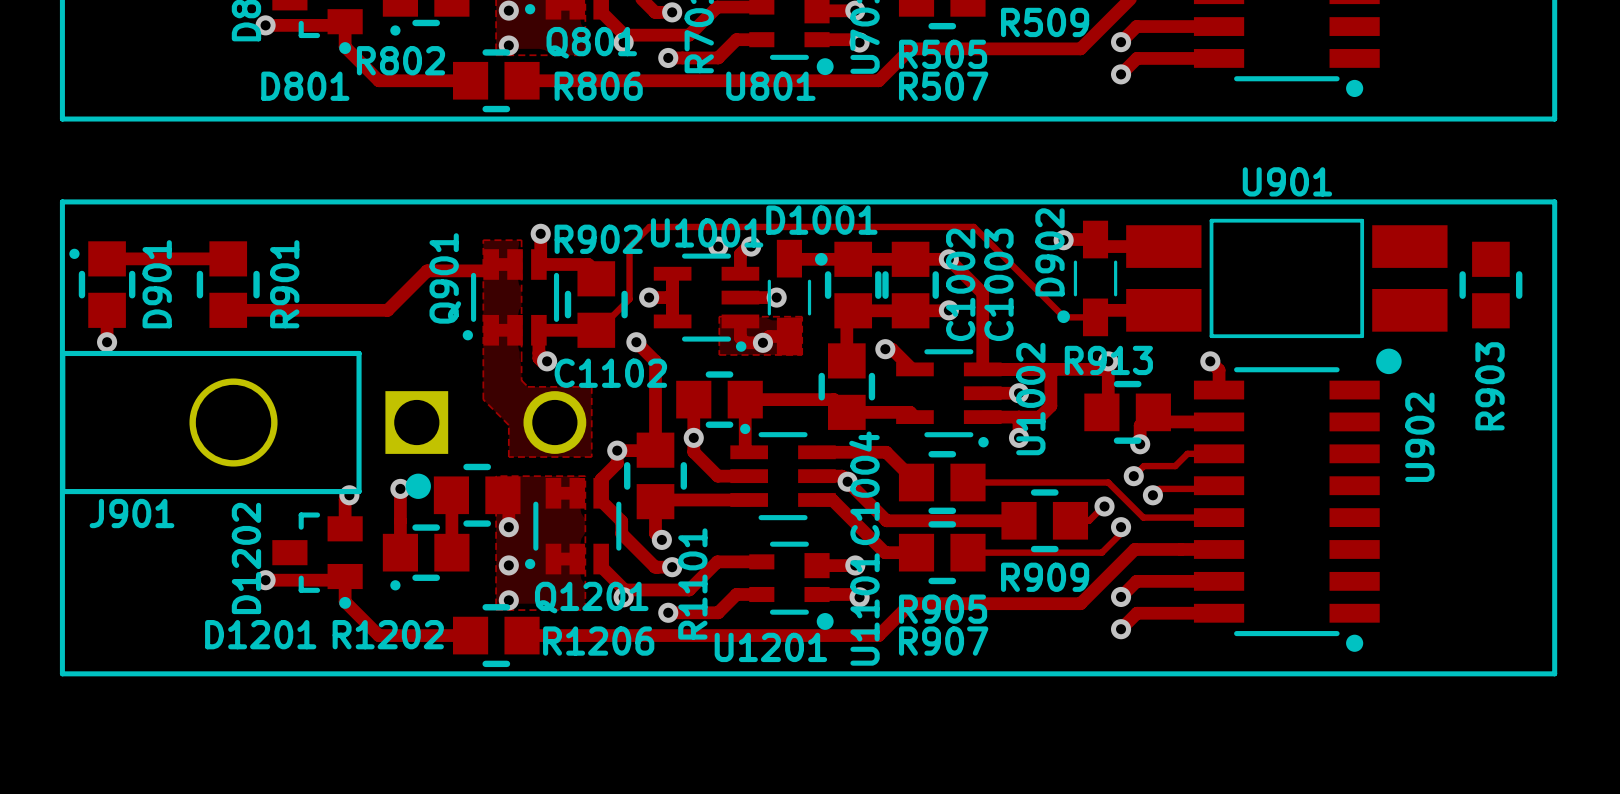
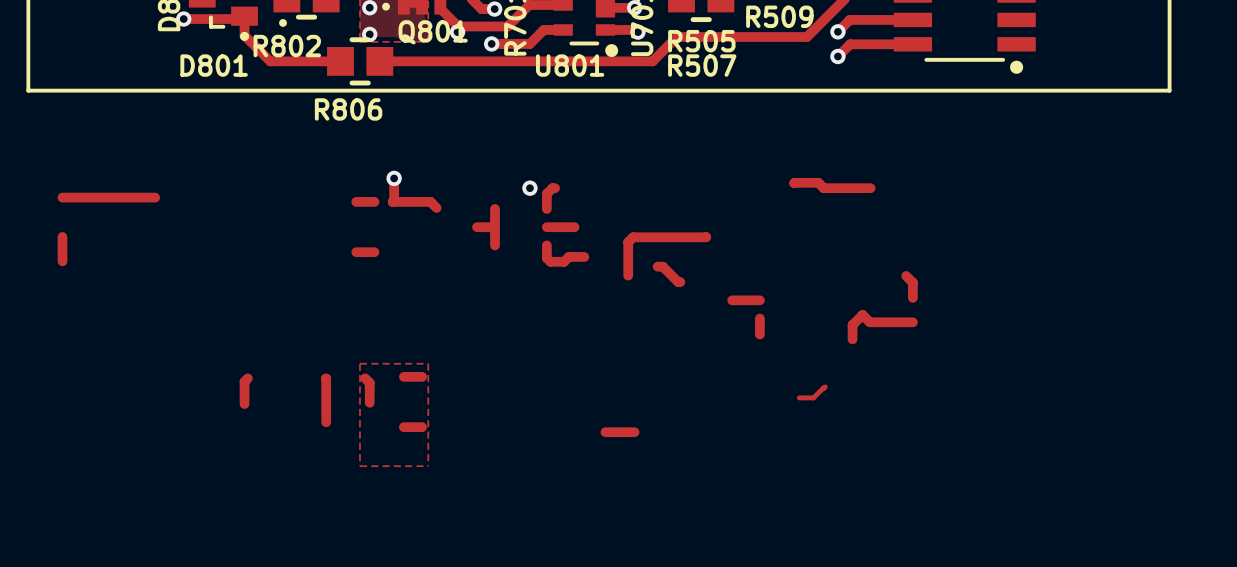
R806 name position: R806 (598, 86) -> R806 (348, 109)
line: (62, 201) (1554, 201) (1554, 673) (62, 673) (62, 201) -> none
zone outline: (483, 240) (483, 399) (508, 425) (508, 457) (591, 457) (591, 386) (527, 386) (521, 380) (521, 240) (483, 240) -> none
via: (1063, 240) -> none
via: (751, 246) -> none
track: (789, 258) (948, 259) (982, 293) (982, 369) (1100, 369) (1108, 361) (1108, 405) (1101, 412) -> none
via: (948, 259) -> none
track: (491, 270) (427, 270) (387, 310) (228, 310) -> none
D902: (1087, 278) -> none
D901: (102, 284) -> none
R901: (228, 284) -> none
C1002: (853, 285) -> none
C1003: (910, 285) -> none
R903: (1490, 285) -> none
U901: (1286, 296) -> none
Q901: (510, 297) -> none
via: (649, 297) -> none
via: (776, 297) -> none
D1001: (797, 297) -> none
U1001: (706, 302) -> none
R902: (596, 304) -> none
via: (948, 310) -> none
track: (1163, 310) (1102, 310) (1095, 317) (1064, 317) (973, 226) (649, 226) (629, 247) (629, 299) (596, 330) -> none
zone outline: (719, 316) (719, 354) (802, 354) (802, 316) (719, 316) -> none
track: (596, 323) (589, 330) (538, 330) (538, 358) (541, 361) (547, 361) (538, 353) -> none
via: (107, 342) -> none
track: (636, 342) (655, 361) (655, 450) (617, 450) (617, 463) (601, 479) (601, 500) (621, 521) (621, 533) (655, 567) (672, 567) -> none
via: (636, 342) -> none
via: (762, 342) -> none
via: (885, 349) -> none
via: (547, 361) -> none
via: (1108, 361) -> none
via: (1210, 361) -> none
track: (1050, 369) (1050, 405) (1039, 417) (982, 417) -> none
C1004: (846, 386) -> none
via: (1019, 393) -> none
U1002: (948, 398) -> none
track: (693, 399) (693, 452) (717, 476) (749, 476) -> none
C1102: (719, 399) -> none
R913: (1127, 412) -> none
track: (914, 417) (910, 412) (846, 412) (834, 399) (745, 399) (745, 448) (749, 452) -> none
J901: (323, 424) -> none
via: (693, 437) -> none
via: (1019, 437) -> none
via: (1140, 444) -> none
via: (617, 450) -> none
track: (816, 452) (886, 452) (916, 482) -> none
track: (1219, 453) (1187, 453) (1175, 466) (1143, 466) (1133, 476) -> none
U1101: (783, 471) -> none
R1101: (655, 475) -> none
track: (816, 476) (842, 476) (886, 520) (1019, 520) -> none
via: (1133, 476) -> none
via: (847, 481) -> none
R905: (942, 482) -> none
track: (967, 482) (1108, 482) (1143, 517) (1219, 517) -> none
track: (1219, 485) (1215, 488) (1159, 488) (1152, 495) -> none
track: (400, 488) (400, 552) -> none
via: (400, 488) -> none
via: (349, 495) -> none
R1202: (477, 495) -> none
via: (1152, 495) -> none
track: (749, 499) (657, 499) (655, 501) (655, 533) (661, 539) -> none
track: (816, 499) (832, 499) (885, 552) (916, 552) -> none
via: (1104, 506) -> none
U902: (1286, 509) -> none
R909: (1044, 520) -> none
Q1201: (573, 526) -> none
via: (508, 527) -> none
track: (1121, 527) (1121, 533) (1101, 552) (967, 552) -> none
via: (1121, 527) -> none
via: (661, 539) -> none
track: (1219, 549) (1134, 549) (1080, 603) (910, 603) (878, 635) (522, 635) -> none
R907: (942, 552) -> none
D1201: (426, 557) -> none
track: (601, 559) (601, 566) (624, 589) (689, 589) (717, 561) (761, 561) -> none
D1202: (317, 560) -> none
via: (508, 565) -> none
via: (855, 565) -> none
via: (672, 567) -> none
track: (265, 580) (341, 580) (345, 576) (345, 601) (378, 635) (470, 635) -> none
via: (265, 580) -> none
track: (1219, 581) (1136, 581) (1121, 596) -> none
U1201: (791, 585) -> none
track: (761, 594) (736, 594) (718, 612) (668, 612) -> none
track: (817, 594) (856, 594) (859, 597) -> none
via: (1121, 596) -> none
via: (623, 597) -> none
via: (859, 597) -> none
via: (508, 600) -> none
via: (668, 612) -> none
track: (1219, 613) (1136, 613) (1121, 629) -> none
via: (1121, 629) -> none
R1206: (496, 635) -> none

